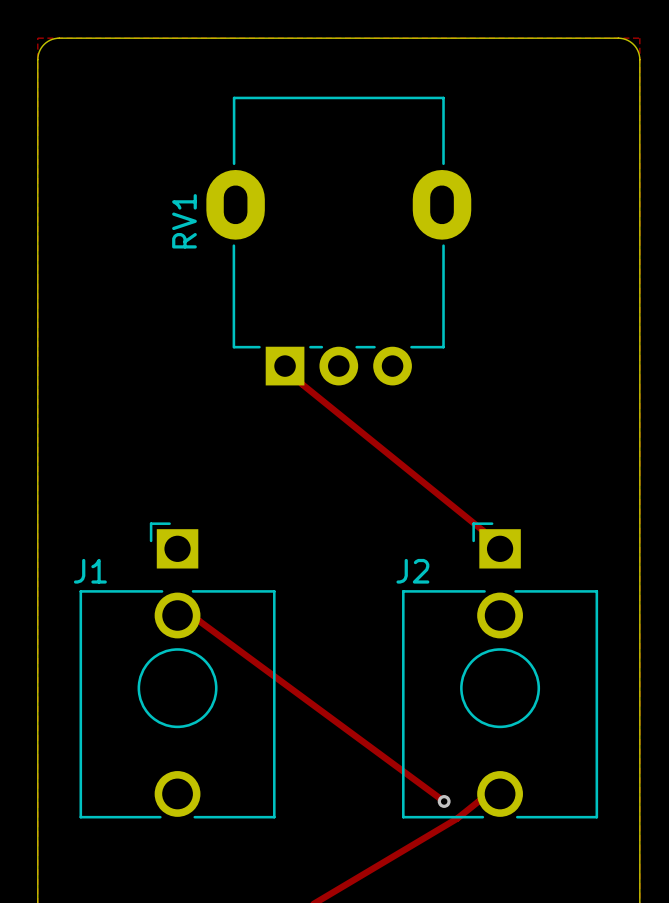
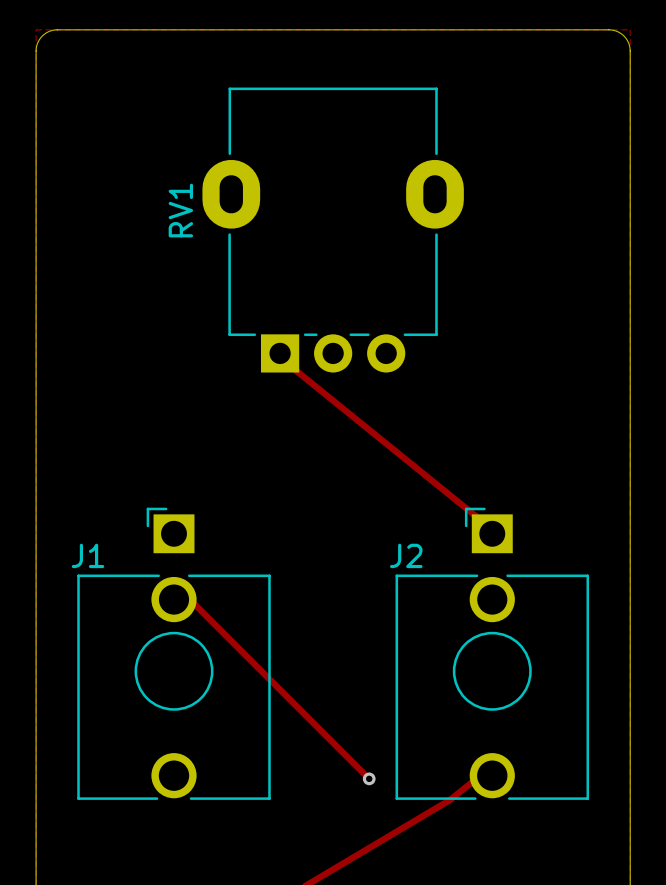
track: (199, 620) (444, 801) -> (195, 604) (369, 778)
via position: (444, 801) -> (369, 778)

